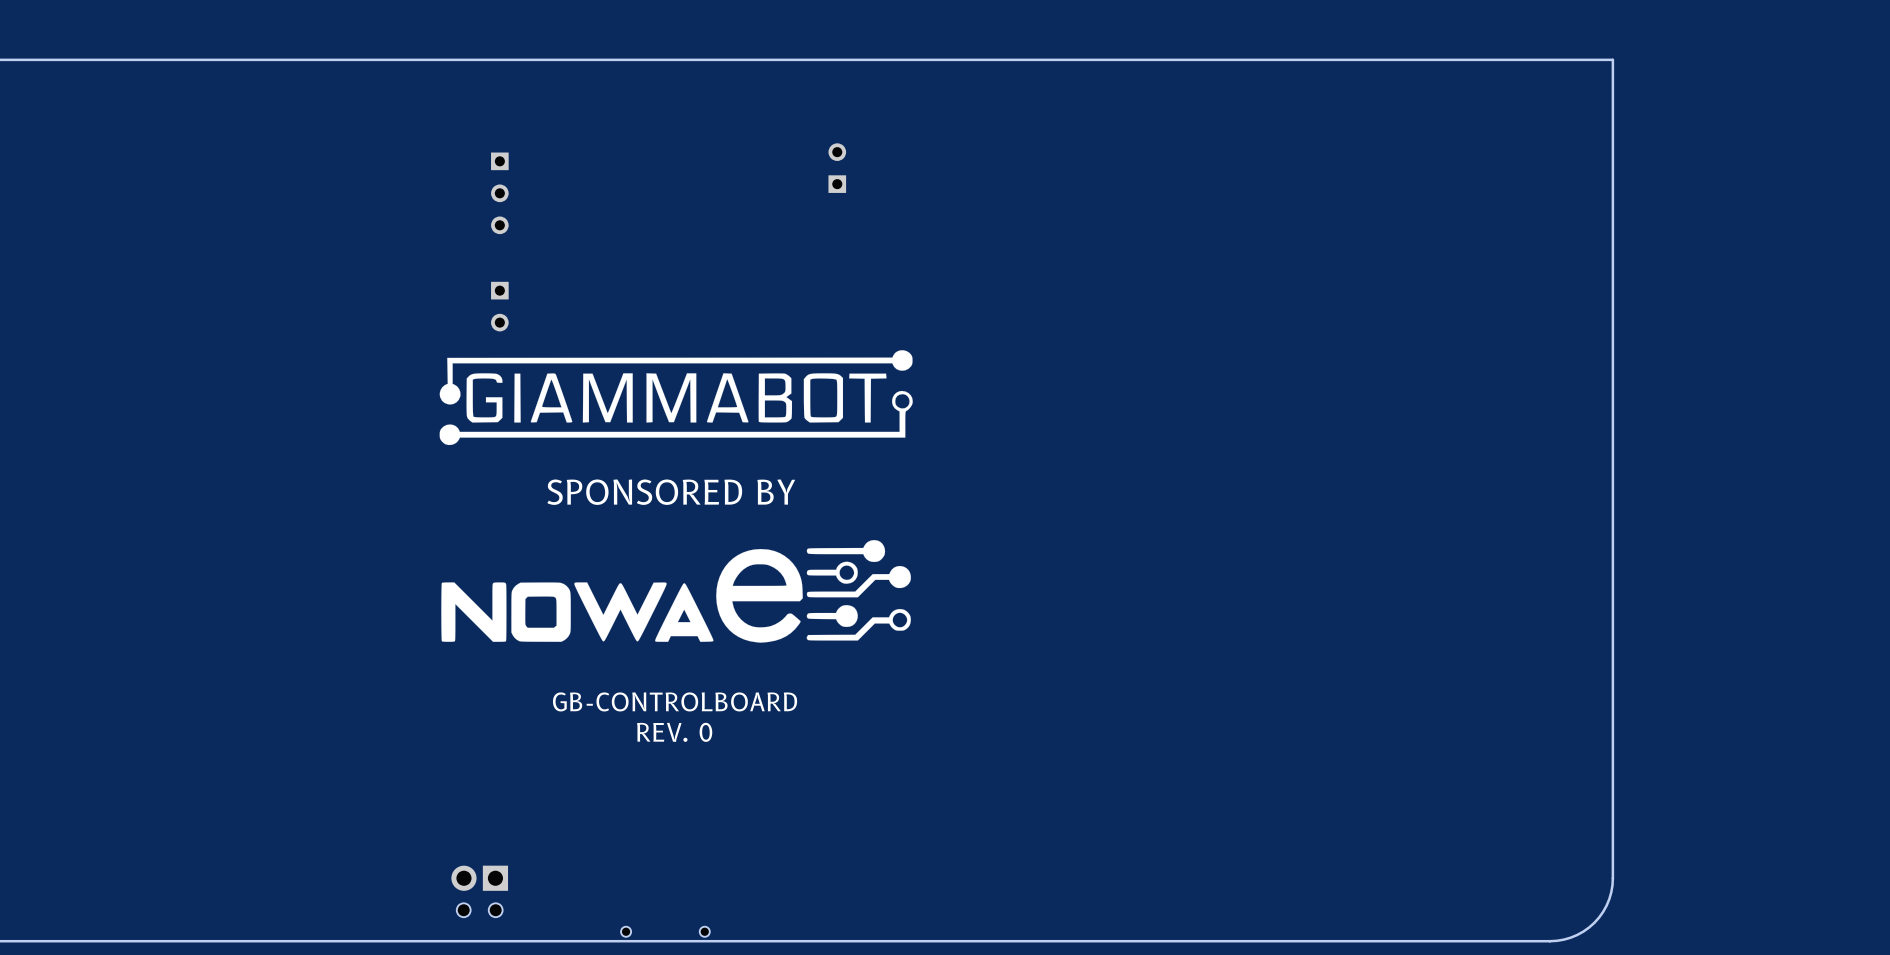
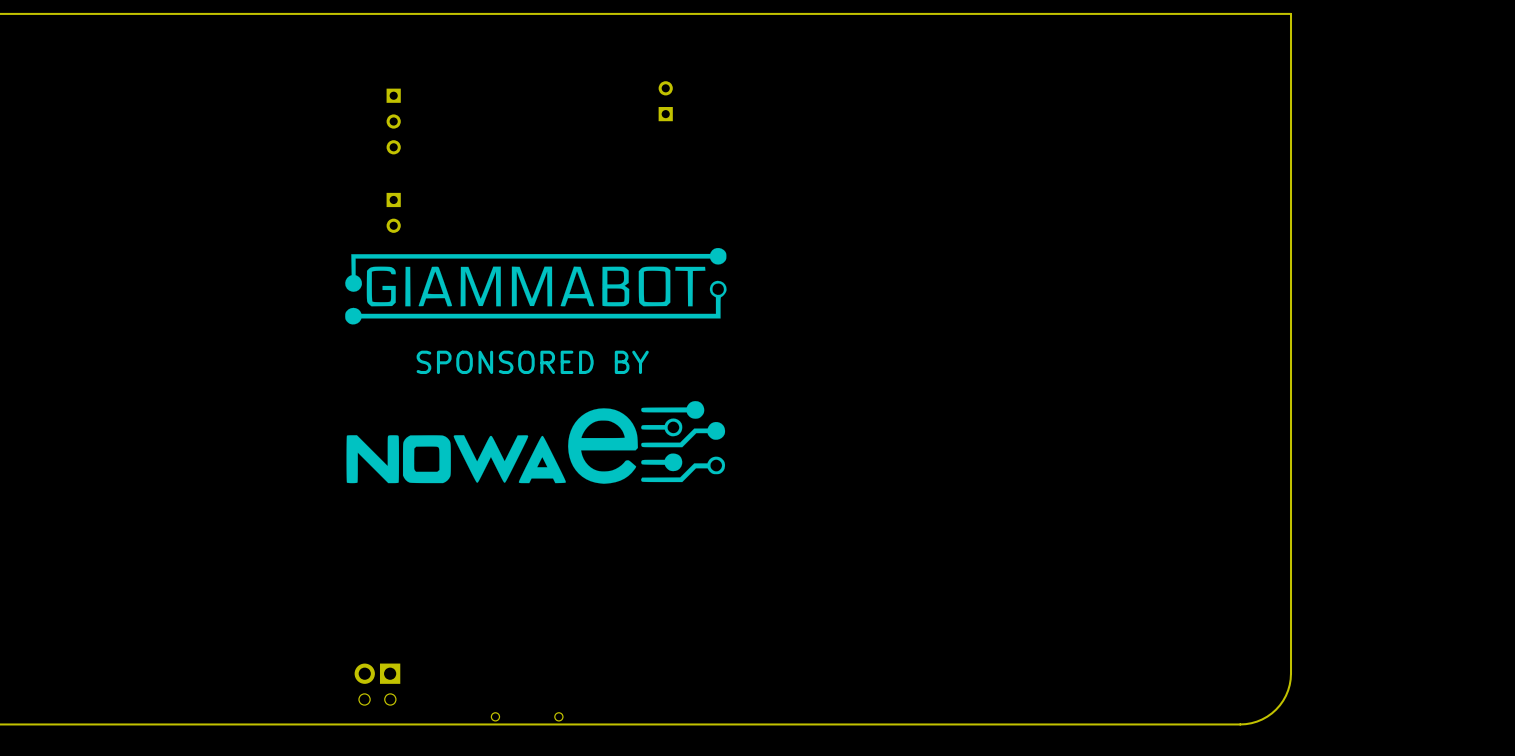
text: GB-CONTROLBOARD (675, 701) -> none
text: REV. 0 (674, 732) -> none

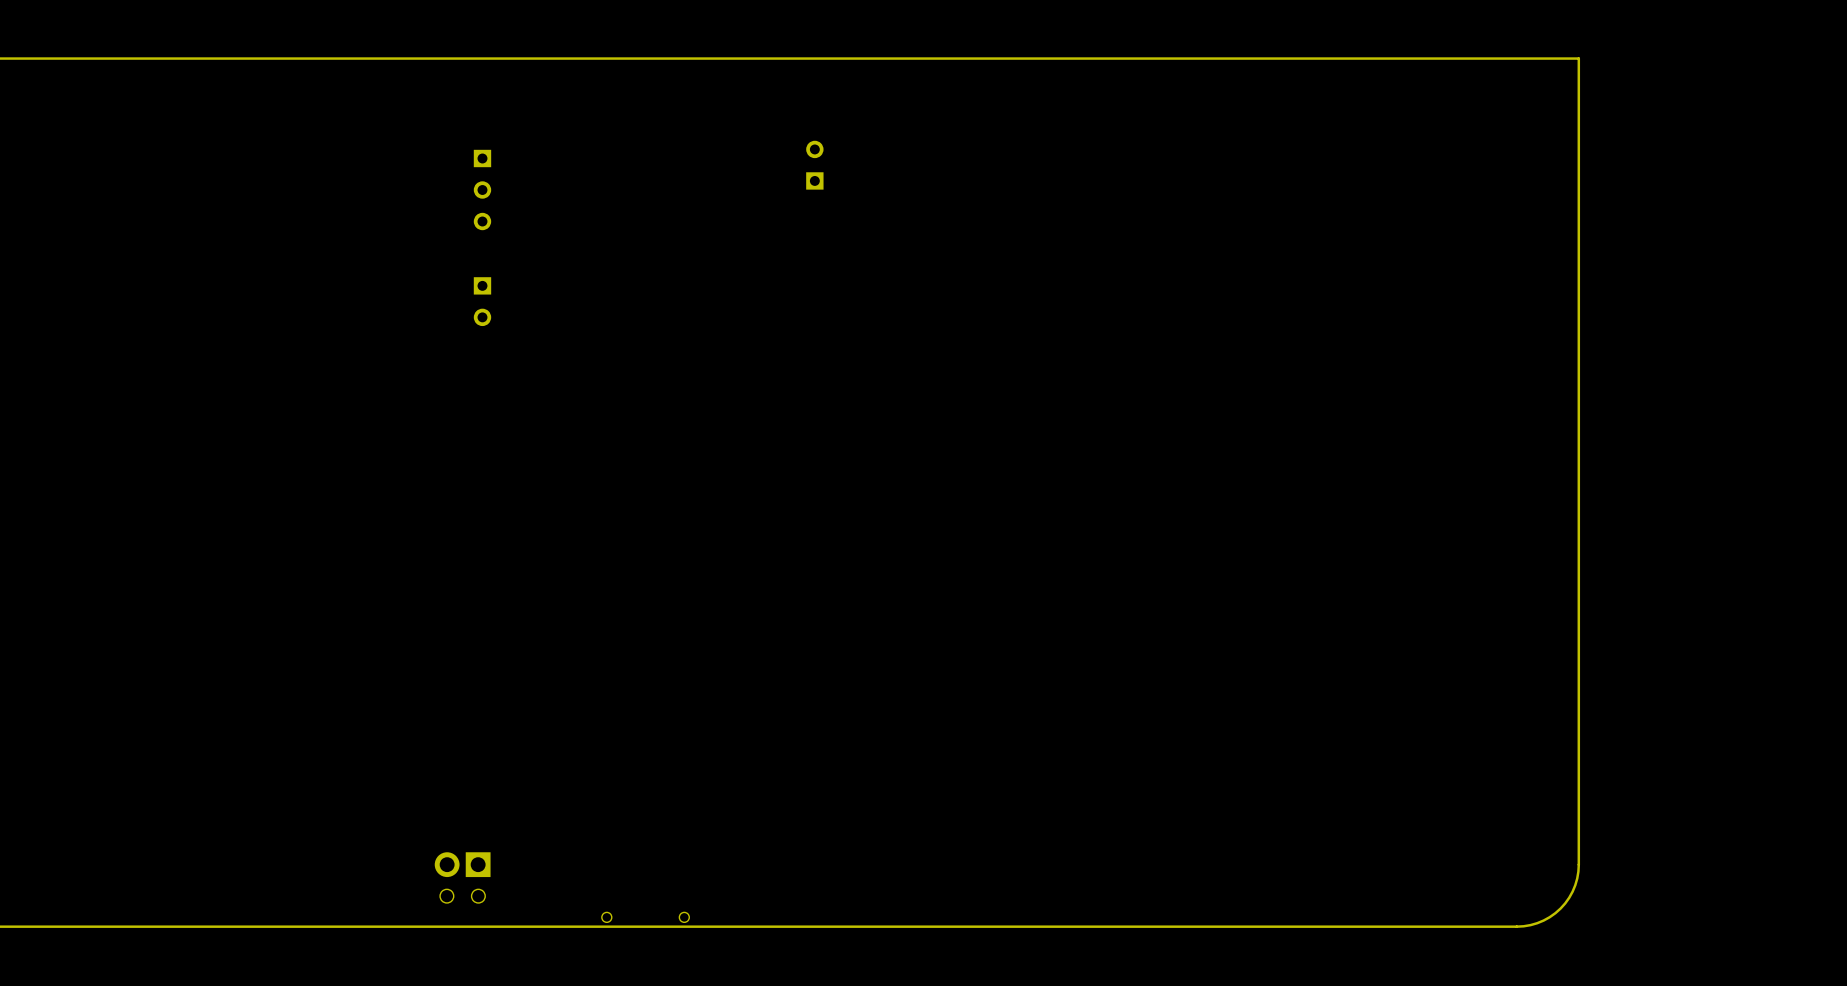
drawing: [345, 248, 727, 325] -> none
text: SPONSORED BY (532, 362) -> none
drawing: [346, 401, 726, 484] -> none

